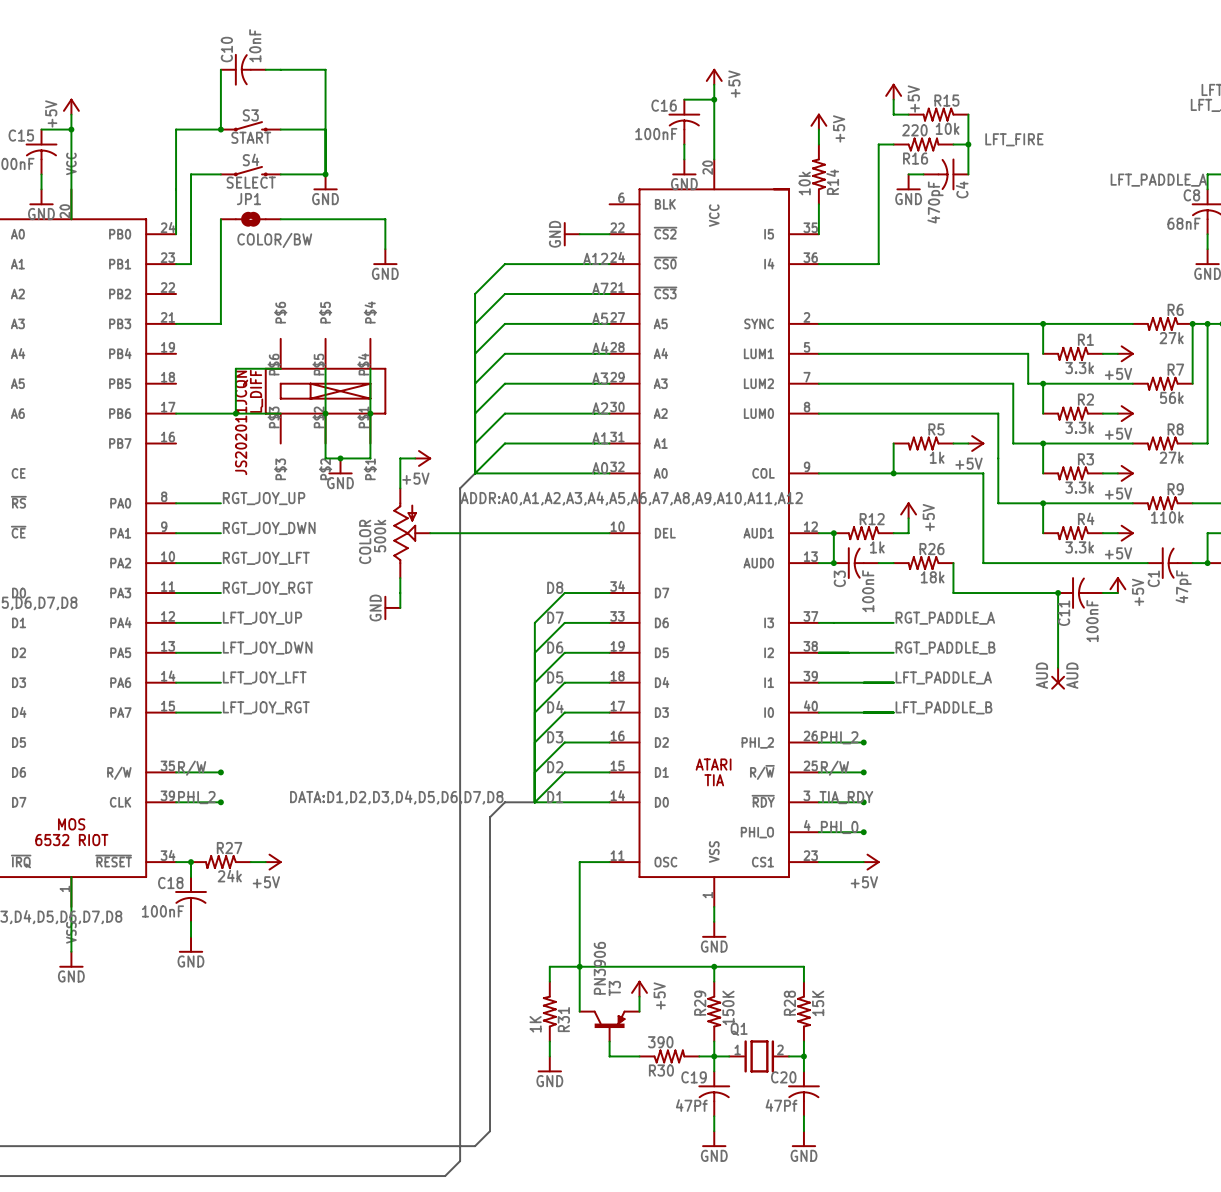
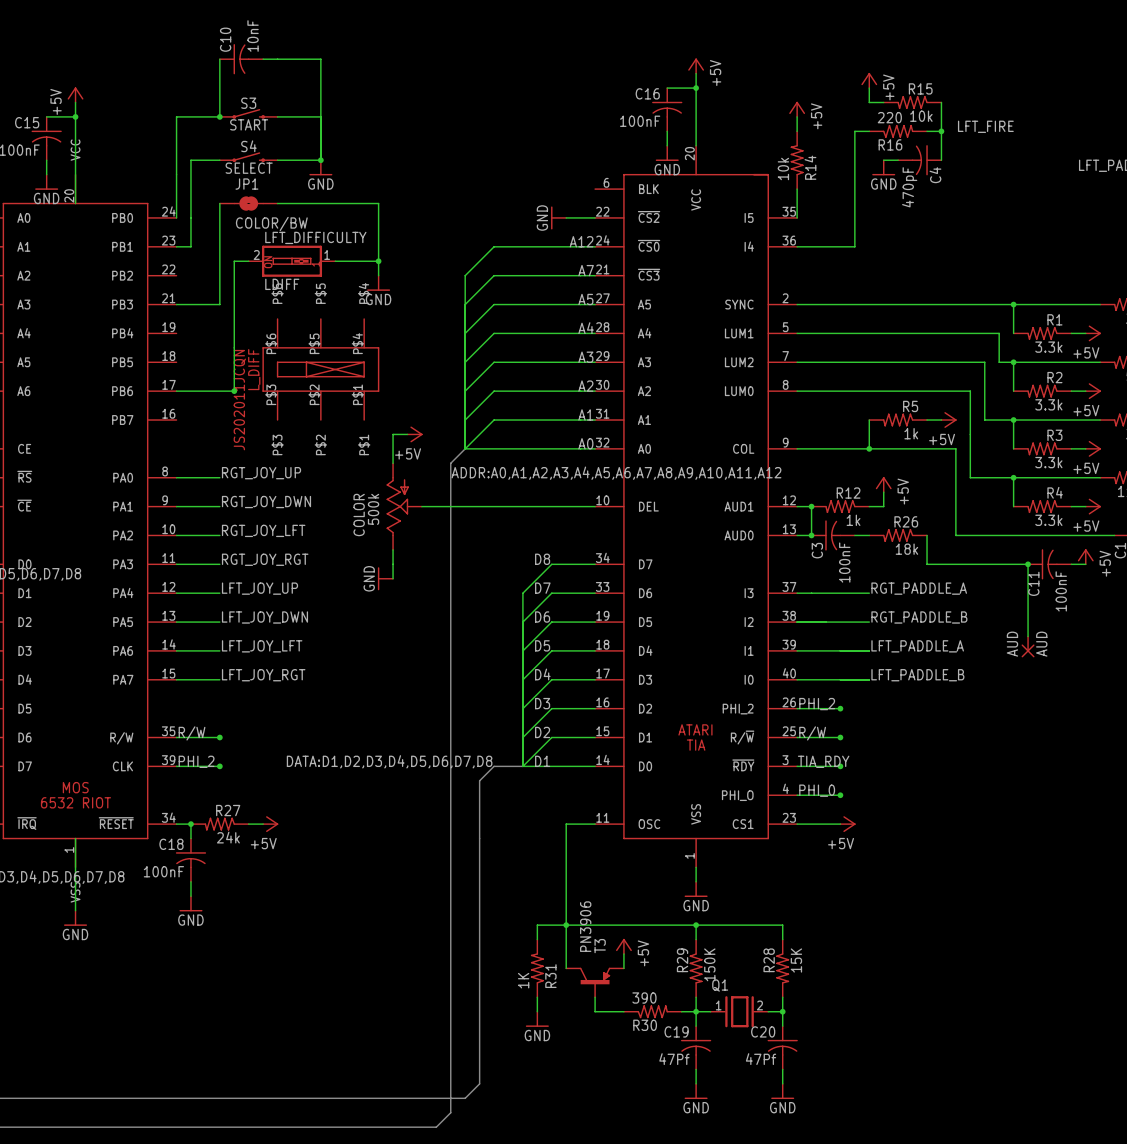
wire: none -> (378, 232) (378, 275)
power symbol position: GND (385, 257) -> GND (378, 283)
LDIFF: none -> LFT_DIFFICULTY (292, 261)
wire: none -> (335, 261) (378, 261)
junction: none -> (378, 261)
wire: (235, 368) (280, 368) -> (234, 347) (234, 261) (248, 261)
wire: (325, 368) (325, 458) (370, 458) (370, 368) -> none
wire: (235, 413) (280, 413) -> none
junction: (325, 413) -> none
junction: (370, 413) -> none
junction: (340, 458) -> none
power symbol: GND (340, 466) -> none

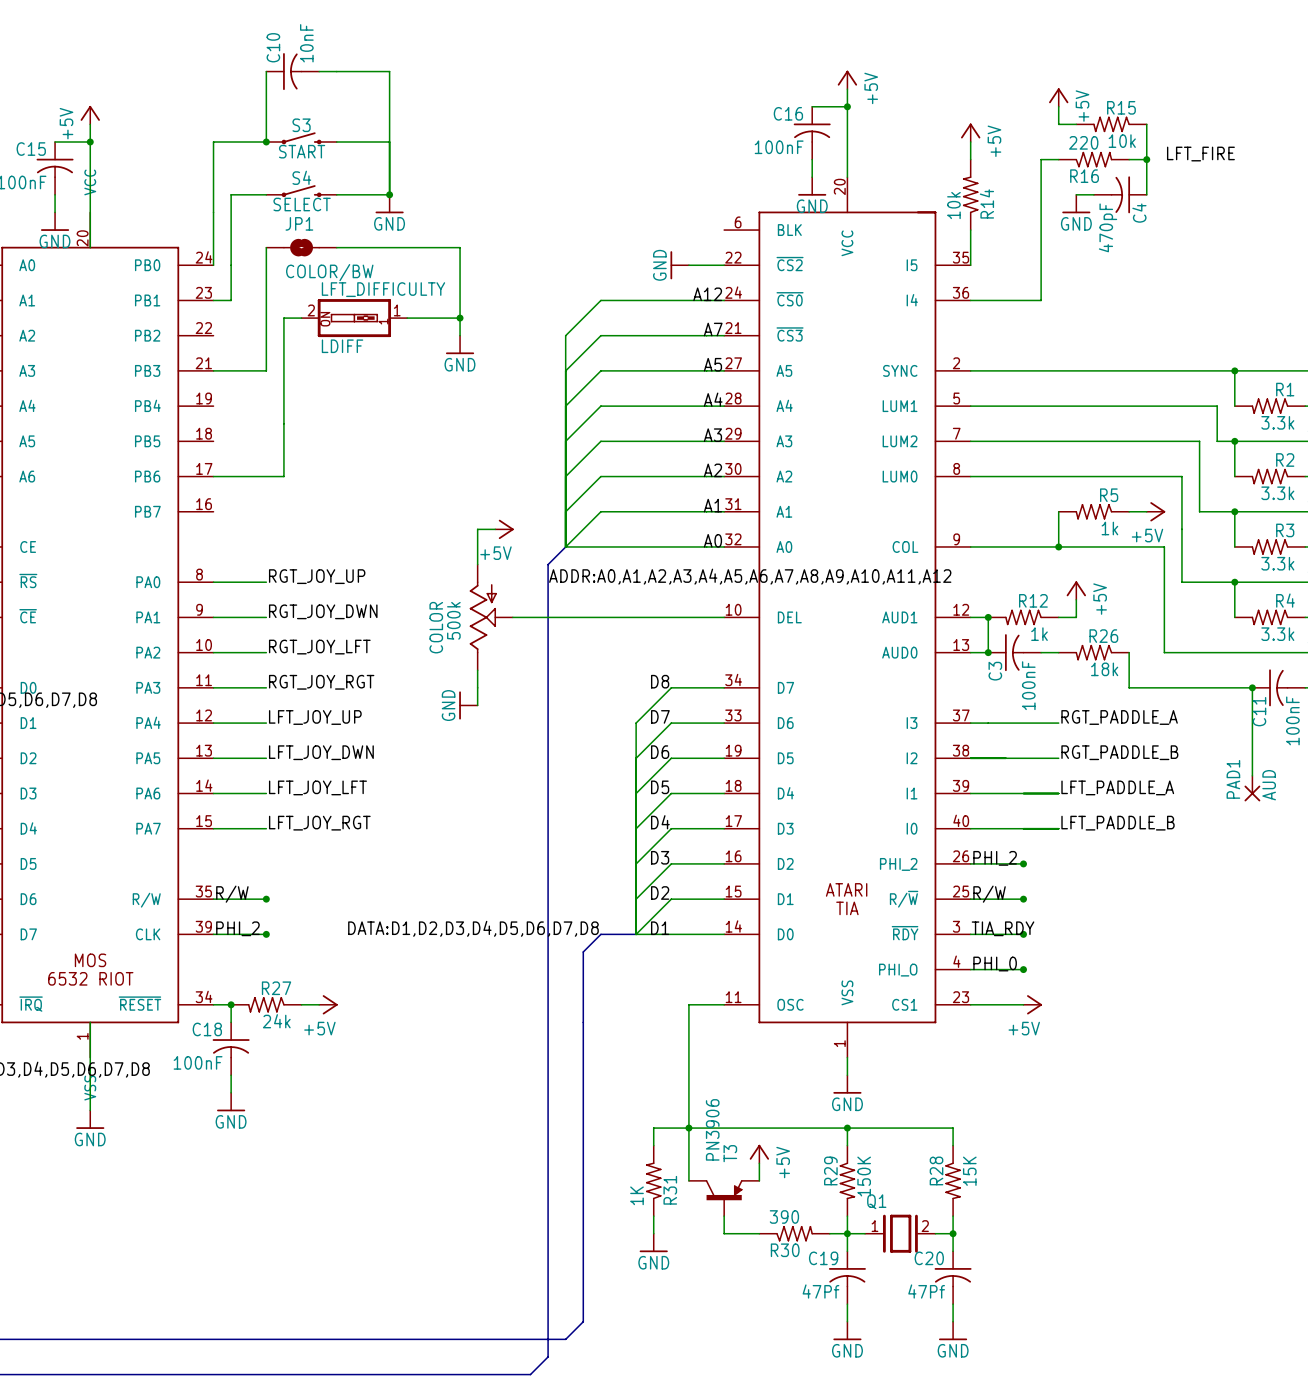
L_DIFF: JS202011JCQN (320, 369) -> none
junction: (234, 391) -> none
AUD name: AUD (1012, 644) -> PAD1 (1233, 779)

